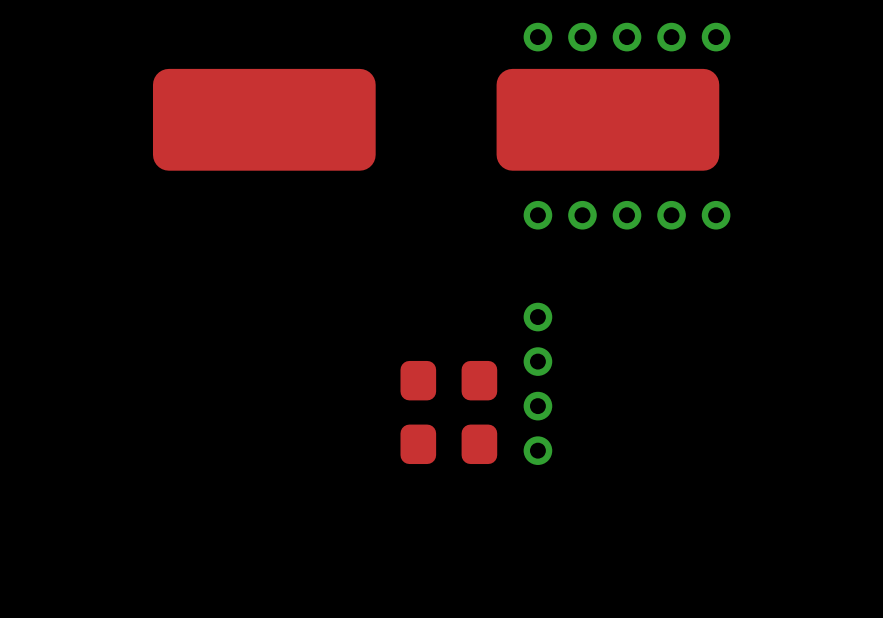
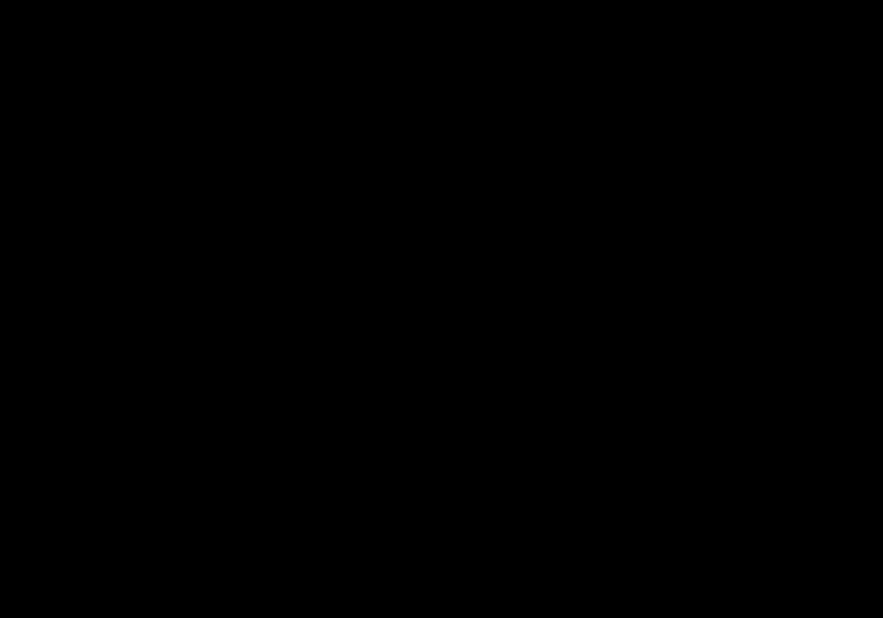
via: (537, 37) -> none
via: (582, 37) -> none
via: (627, 37) -> none
via: (671, 37) -> none
via: (716, 37) -> none
part: (436, 119) -> none
via: (537, 215) -> none
via: (582, 215) -> none
via: (627, 215) -> none
via: (671, 215) -> none
via: (716, 215) -> none
via: (537, 317) -> none
via: (537, 361) -> none
part: (448, 380) -> none
via: (537, 406) -> none
part: (448, 444) -> none
via: (537, 450) -> none

